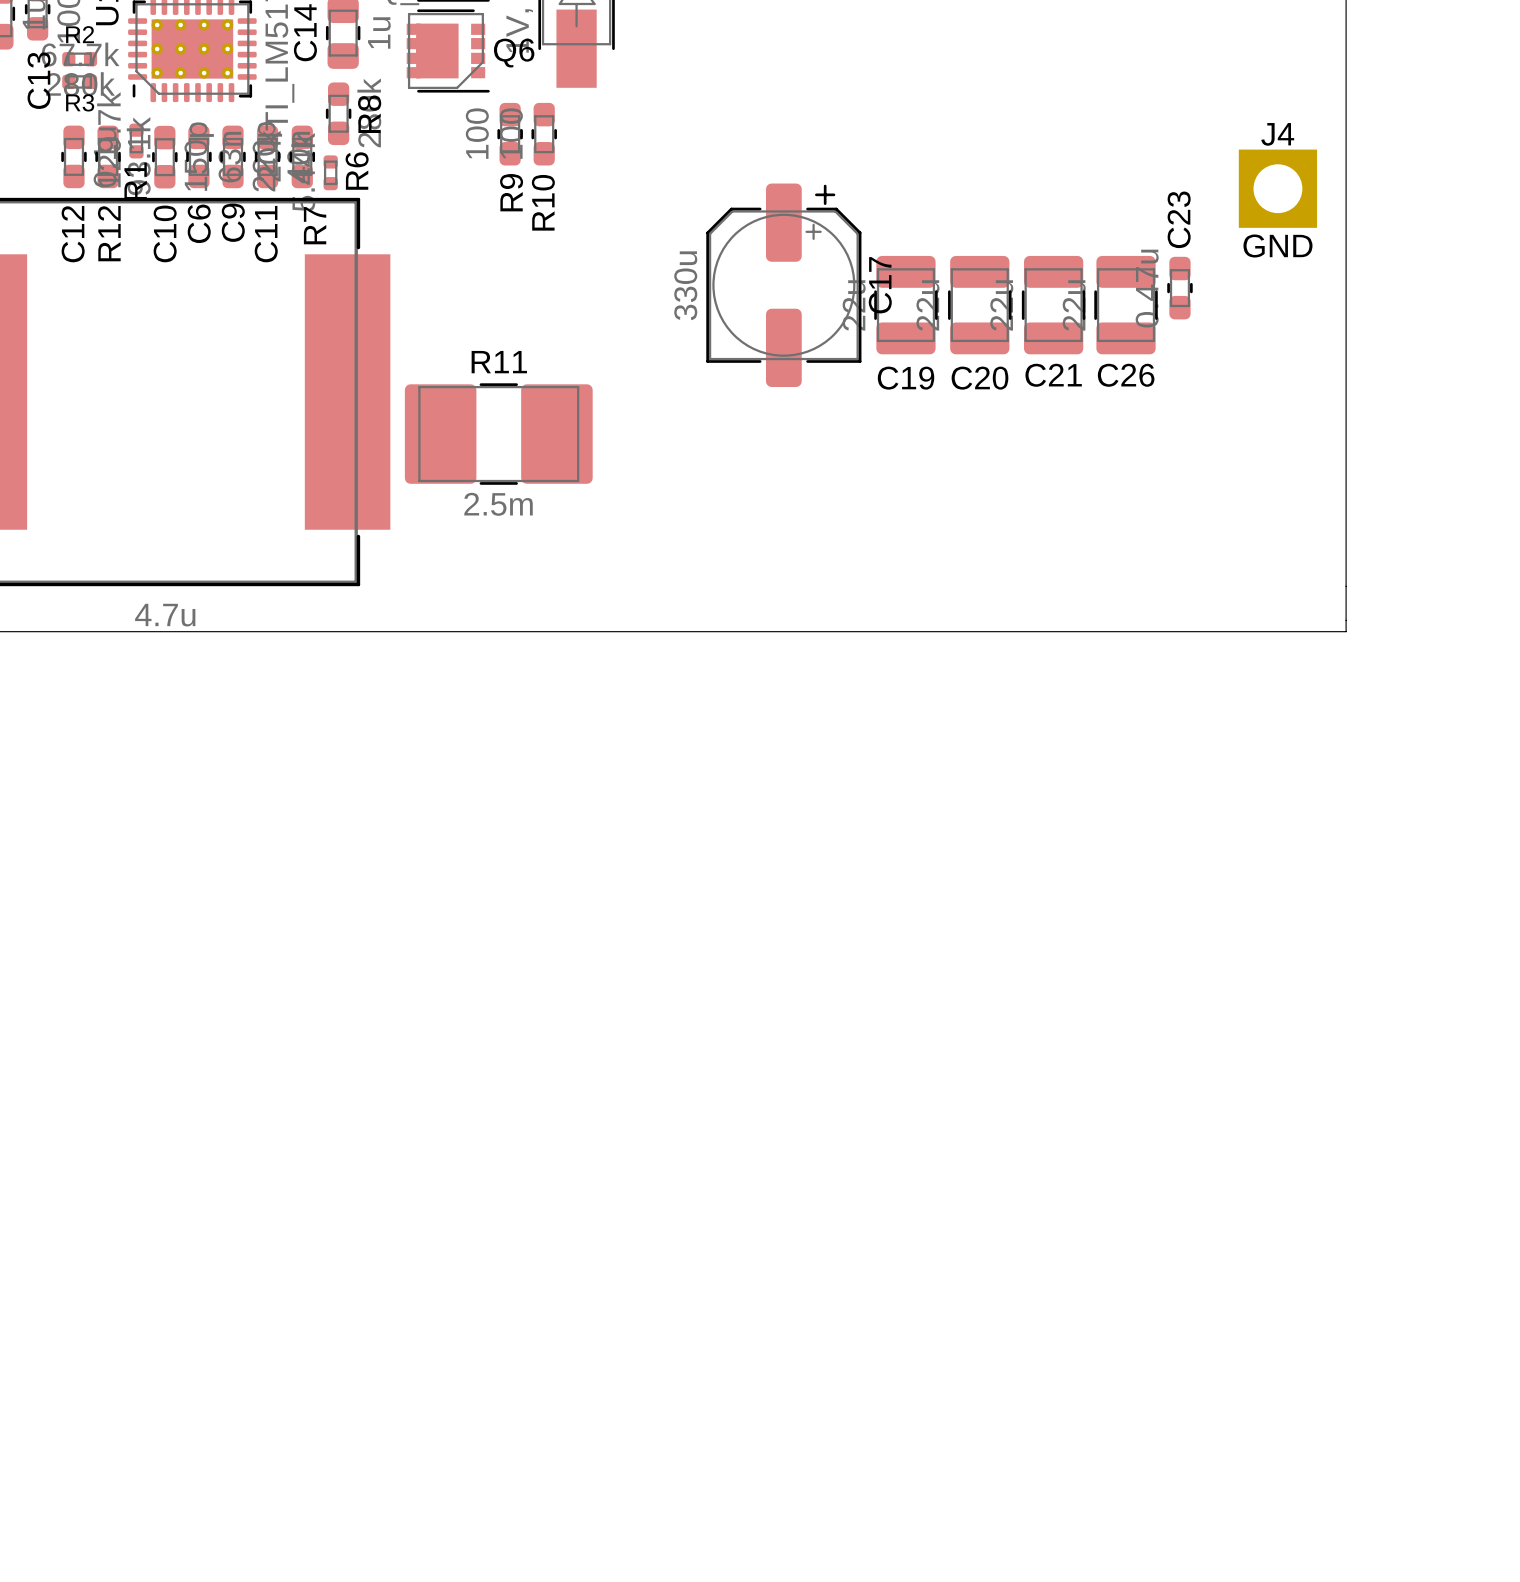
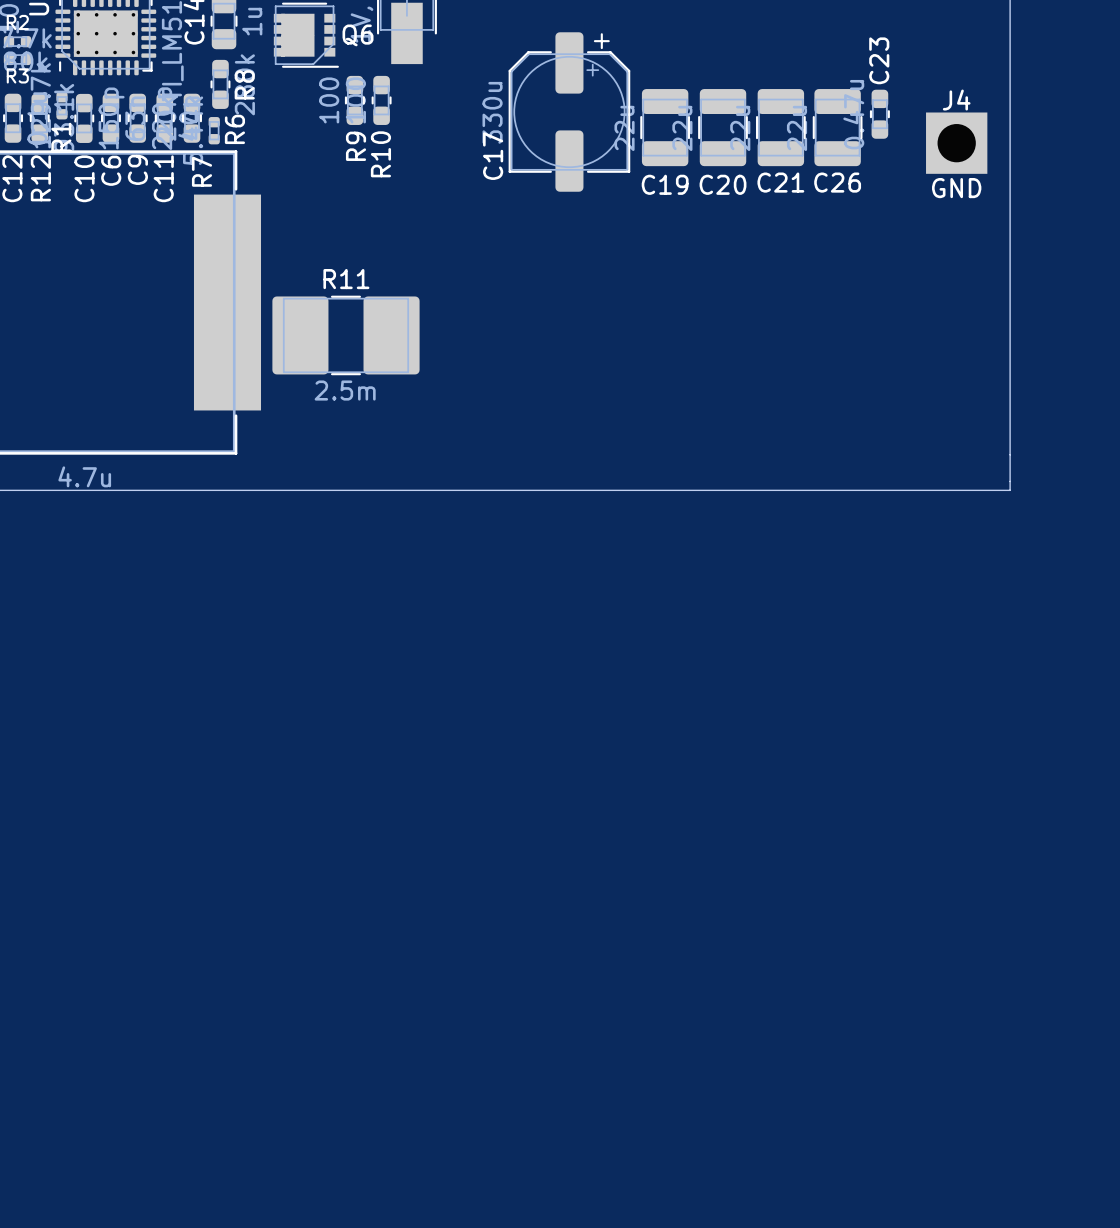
C17 position: (783, 285) -> (569, 112)
C17 name position: C17 (880, 285) -> C17 (493, 156)
C23 position: (1179, 288) -> (879, 114)
C19 position: (905, 305) -> (665, 127)
C20 position: (979, 305) -> (723, 127)
C21 position: (1053, 305) -> (780, 127)
C26 position: (1126, 305) -> (837, 127)

